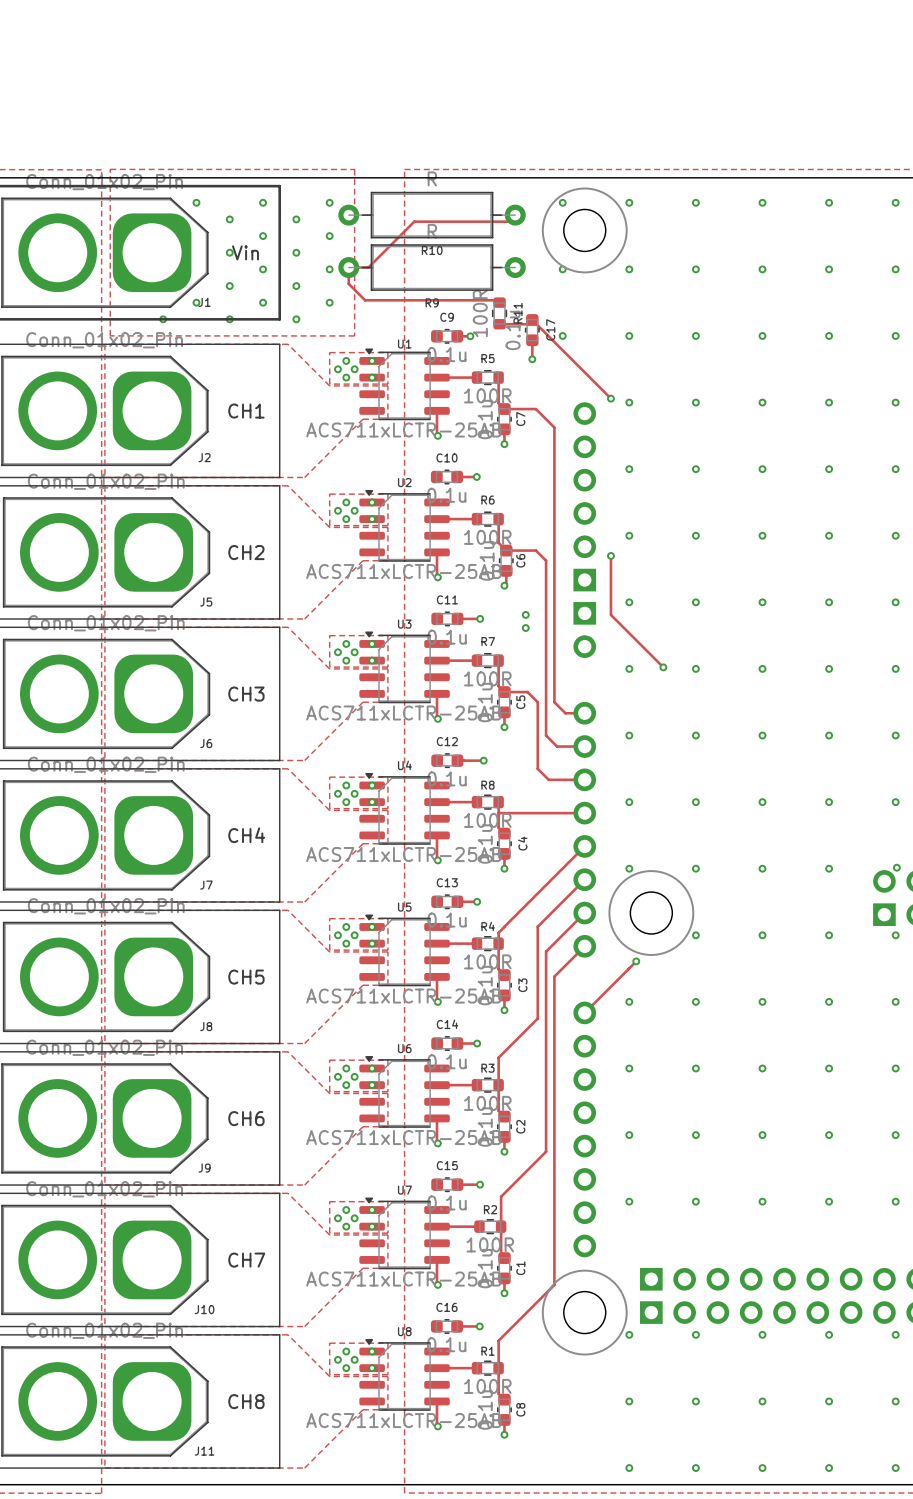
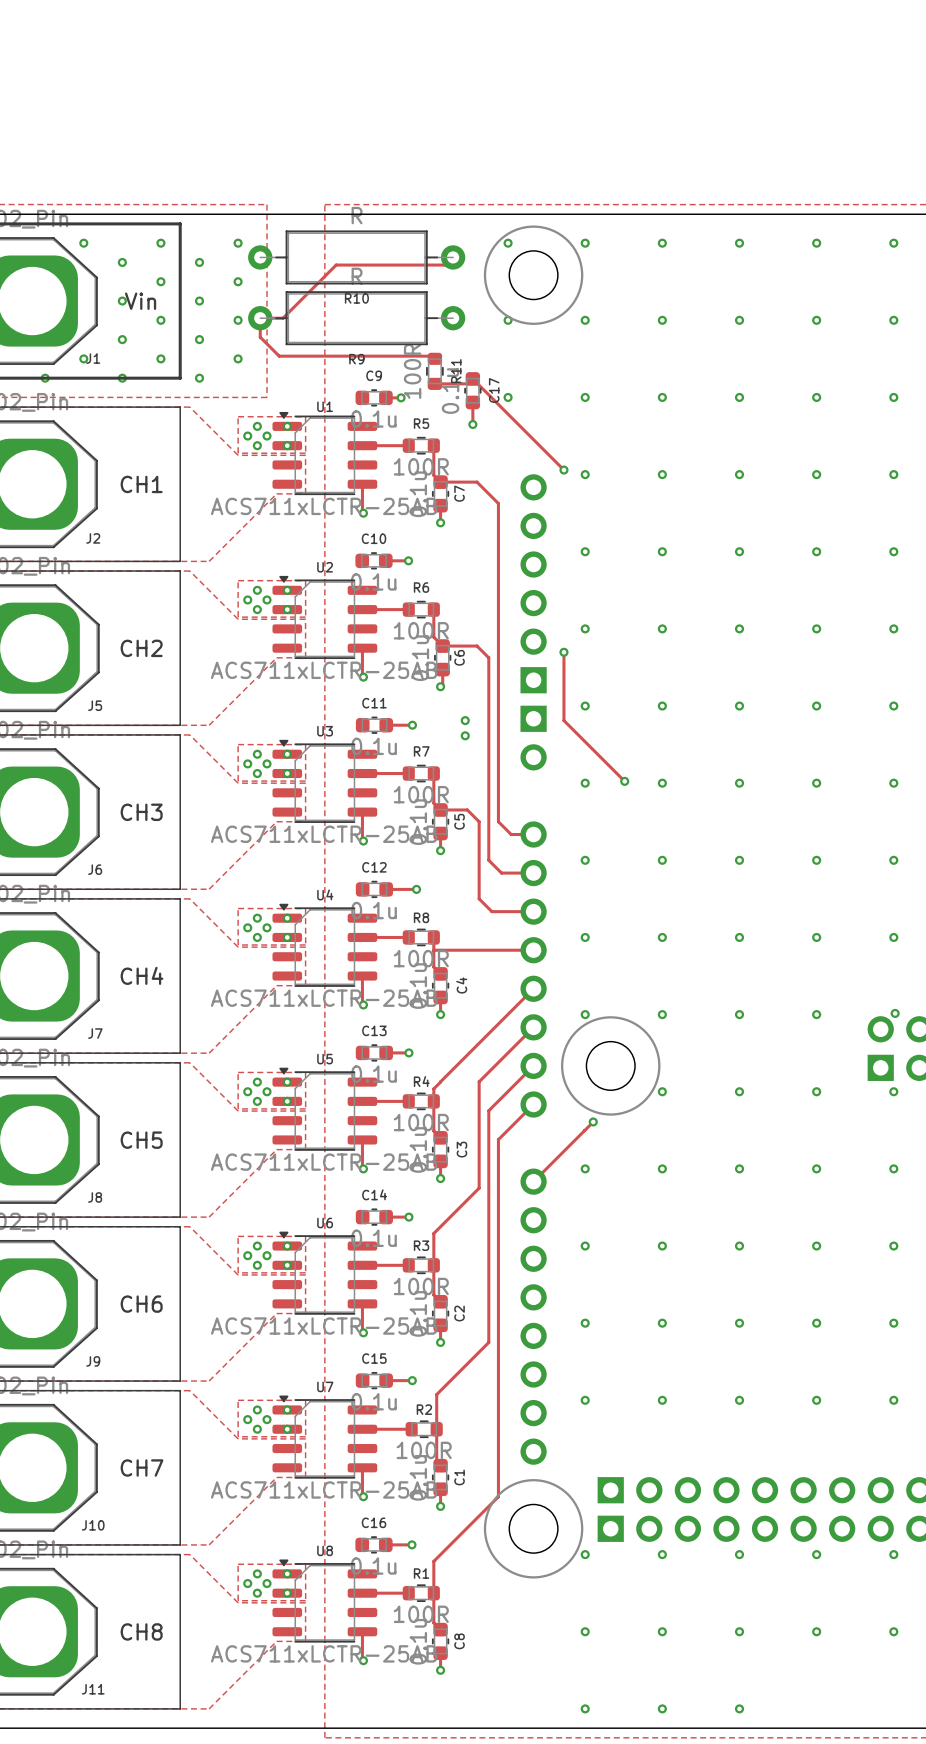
via: (829, 1468) -> none
via: (895, 1468) -> none

